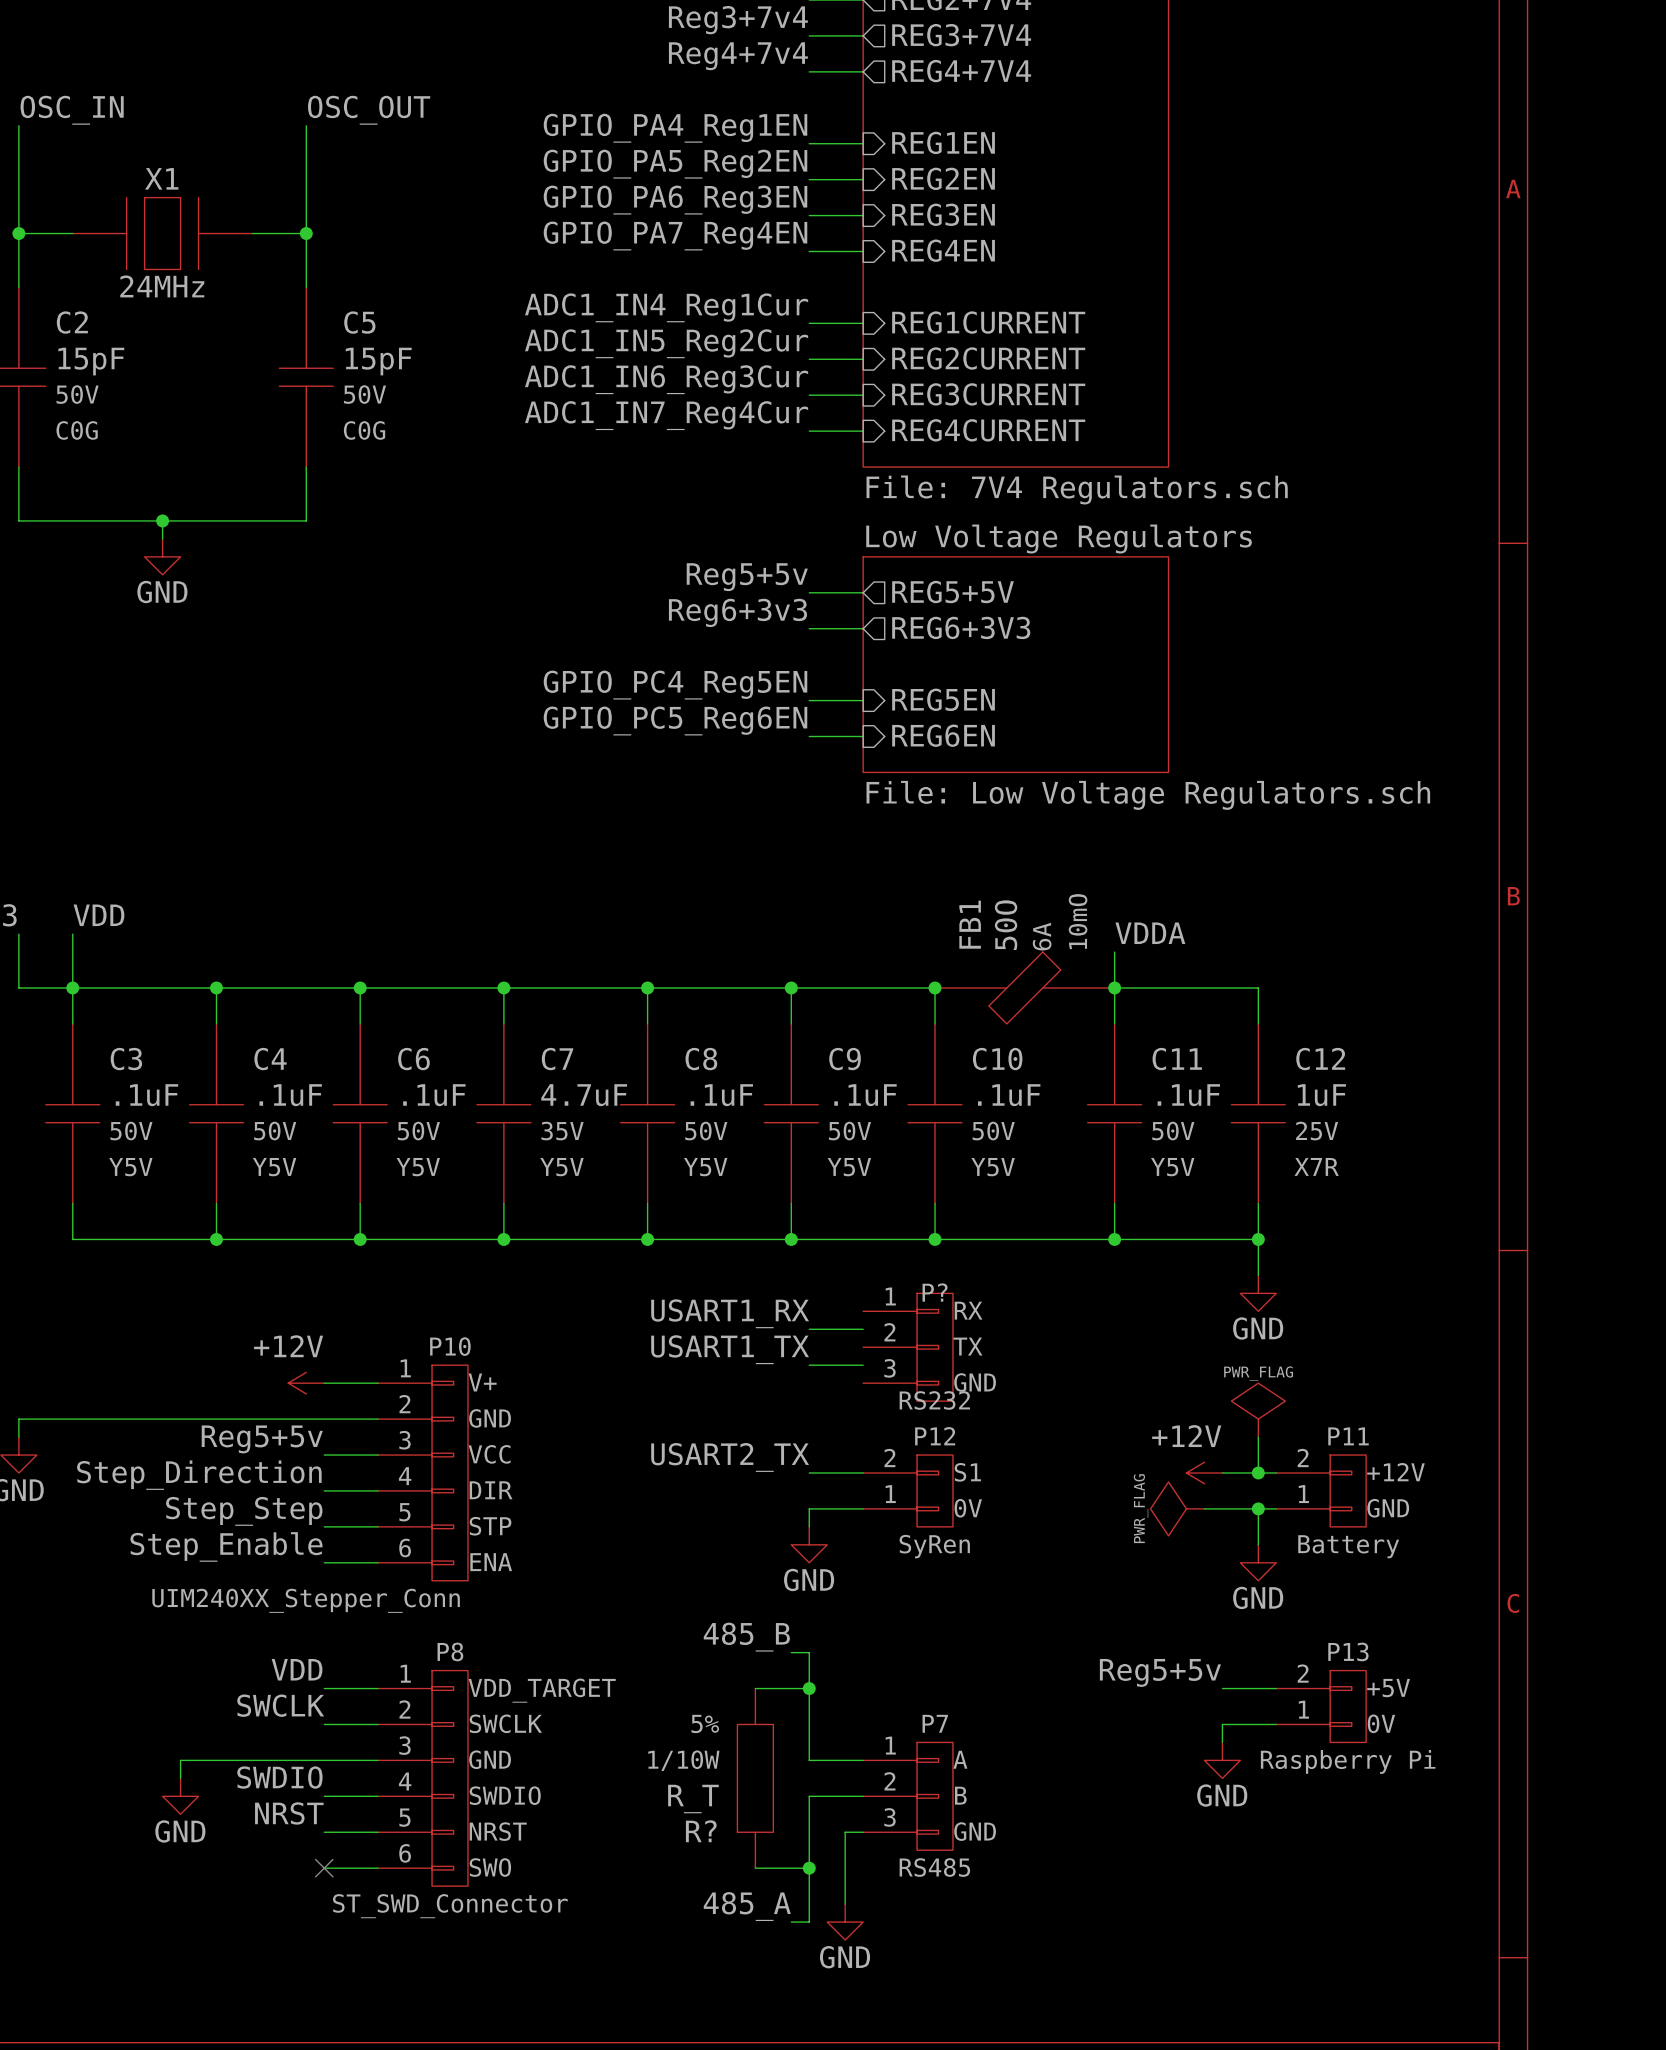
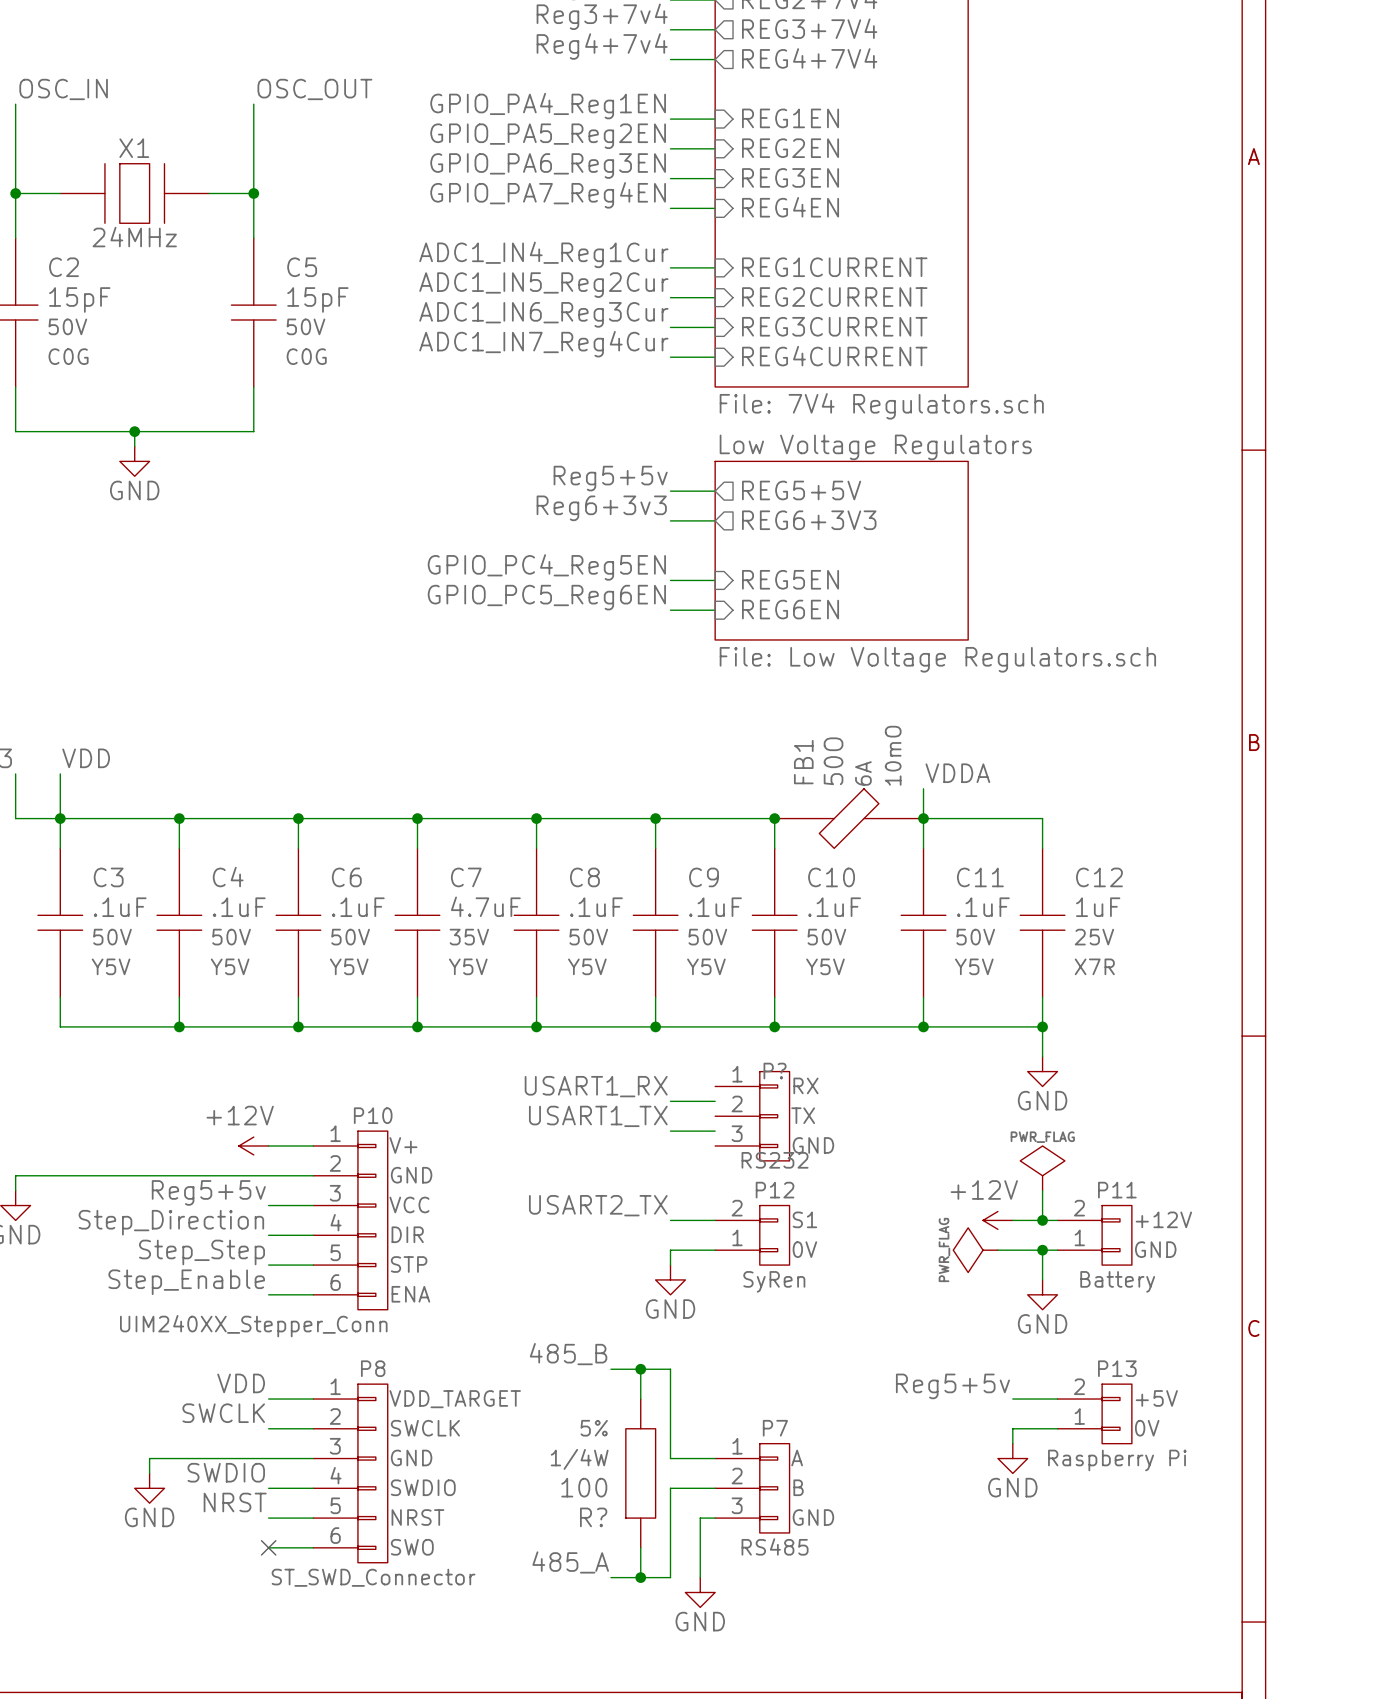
label position: 485_B (746, 1637) -> 485_B (568, 1354)
wire: none -> (640, 1369) (640, 1399)
wire: (755, 1688) (809, 1688) -> (610, 1369) (655, 1369)
junction position: (809, 1688) -> (640, 1369)
R?: R_T (755, 1778) -> none
R?: none -> 100 (640, 1473)
wire: (755, 1868) (809, 1868) -> none
wire: none -> (640, 1547) (640, 1577)
junction position: (809, 1868) -> (640, 1577)
wire: (809, 1904) (809, 1922) (791, 1922) -> (670, 1577) (610, 1577)
label position: 485_A (747, 1906) -> 485_A (570, 1562)

